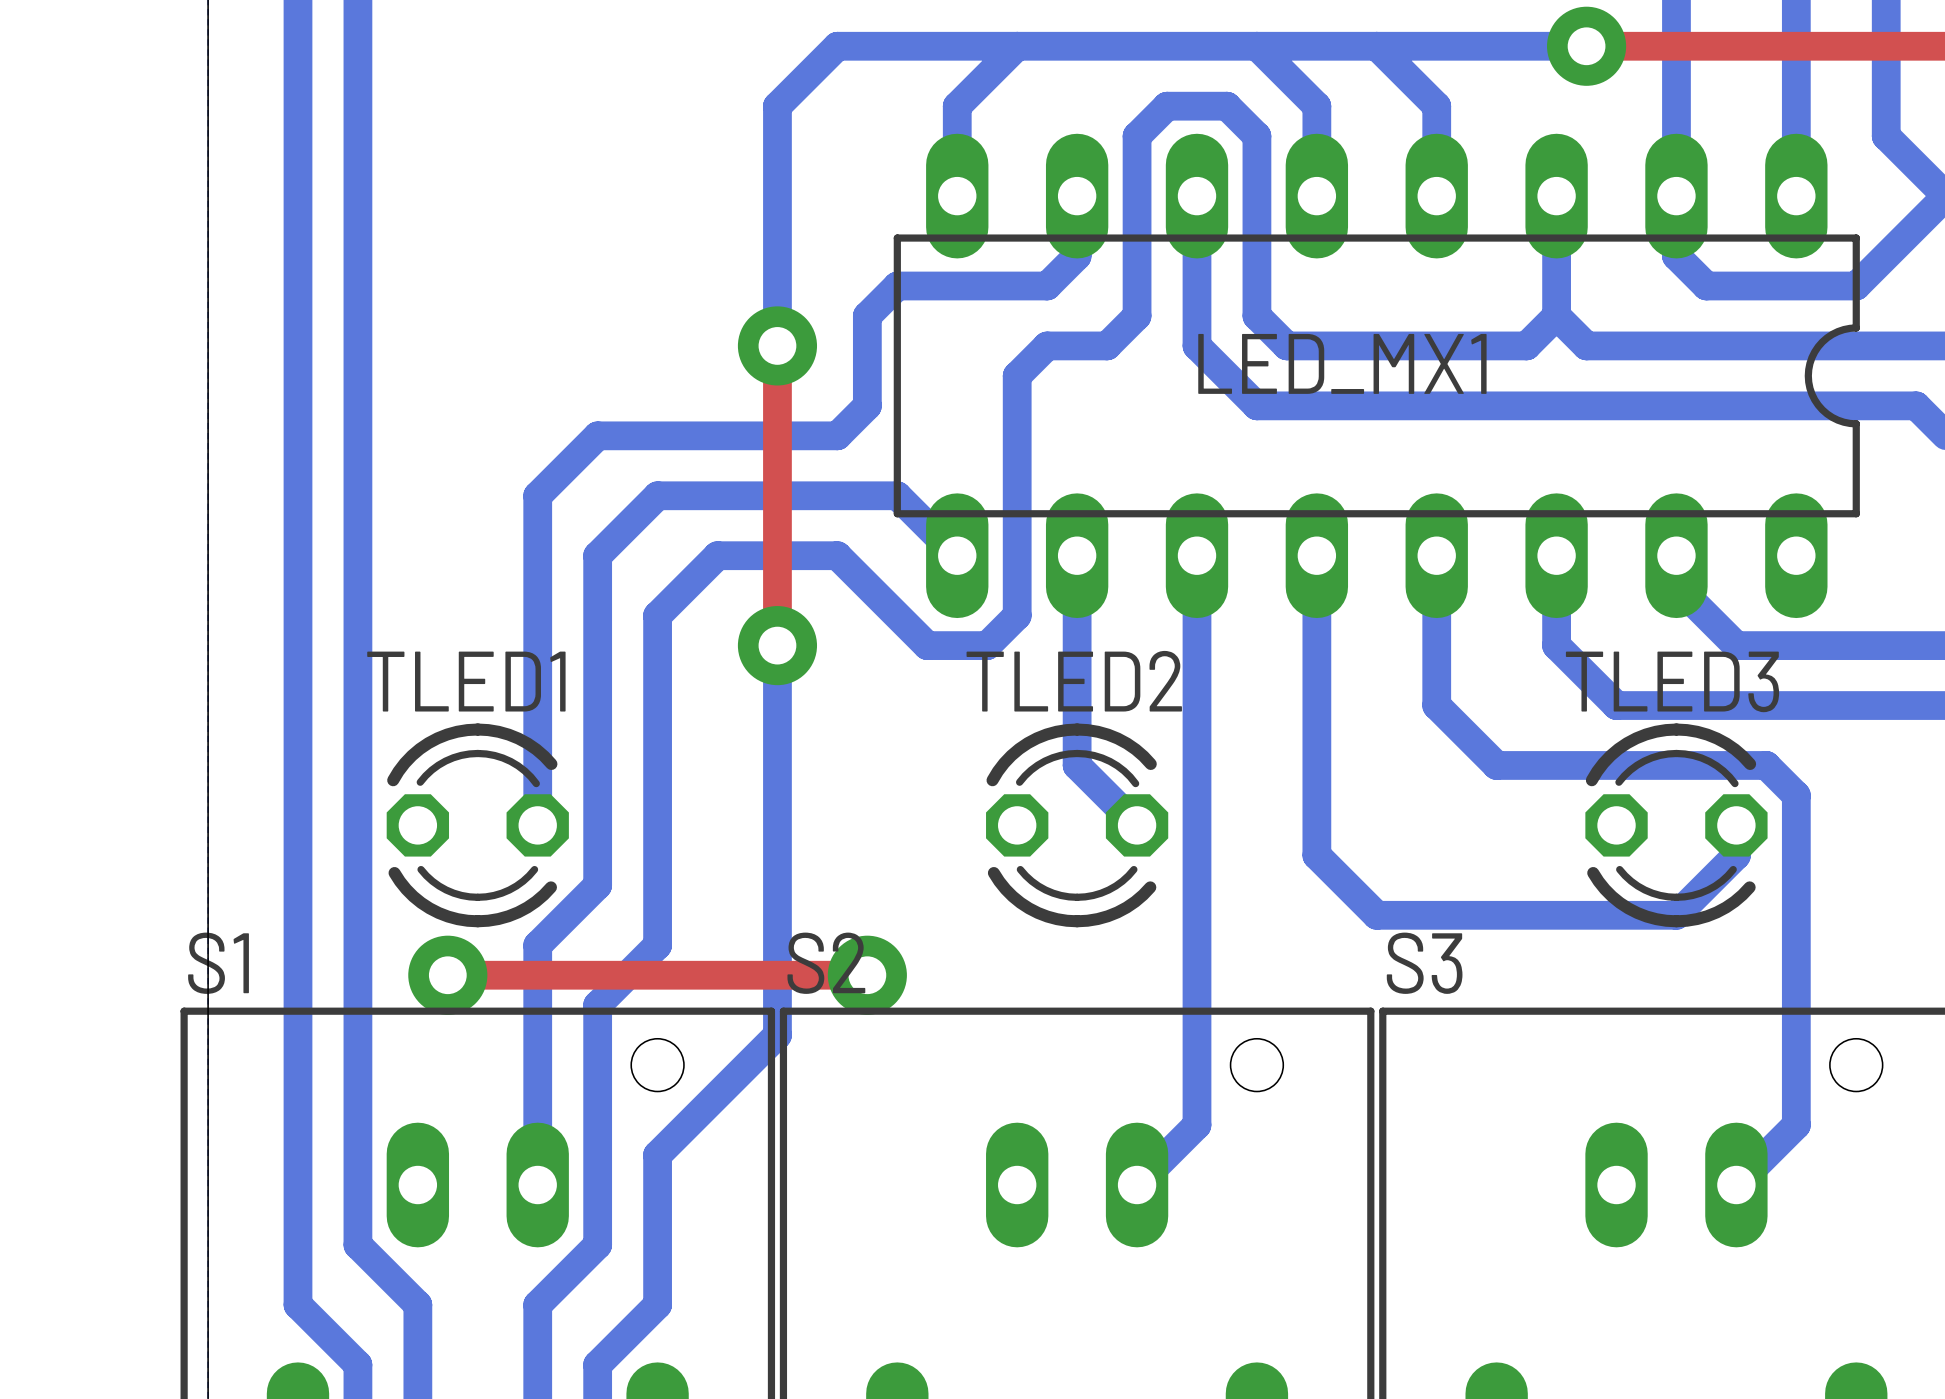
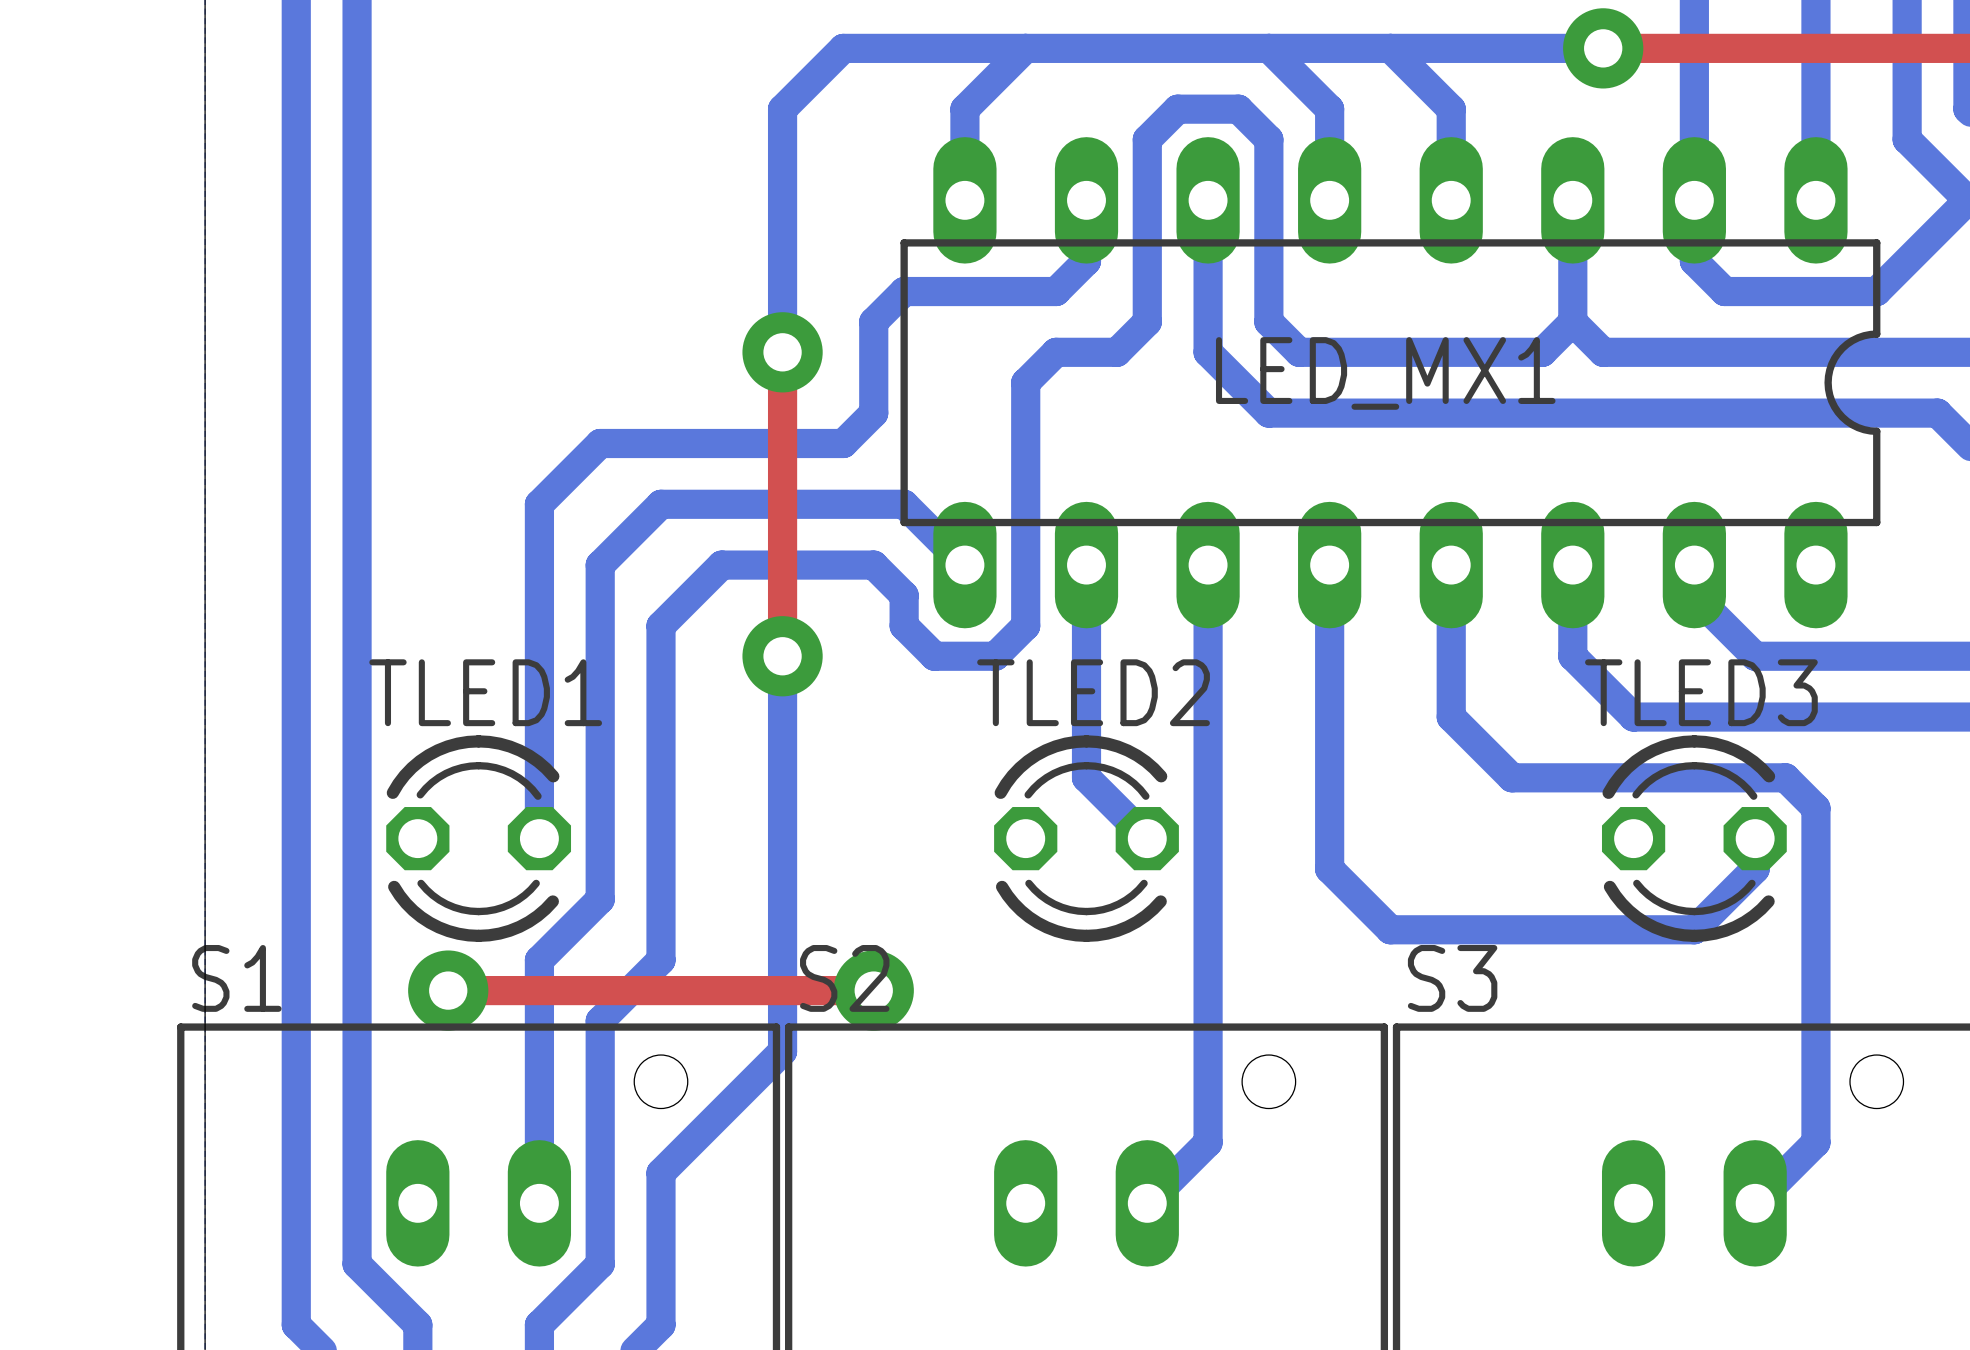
bottom track: (837, 555) (897, 615) -> (843, 565) (873, 565) (904, 595) (904, 625)

